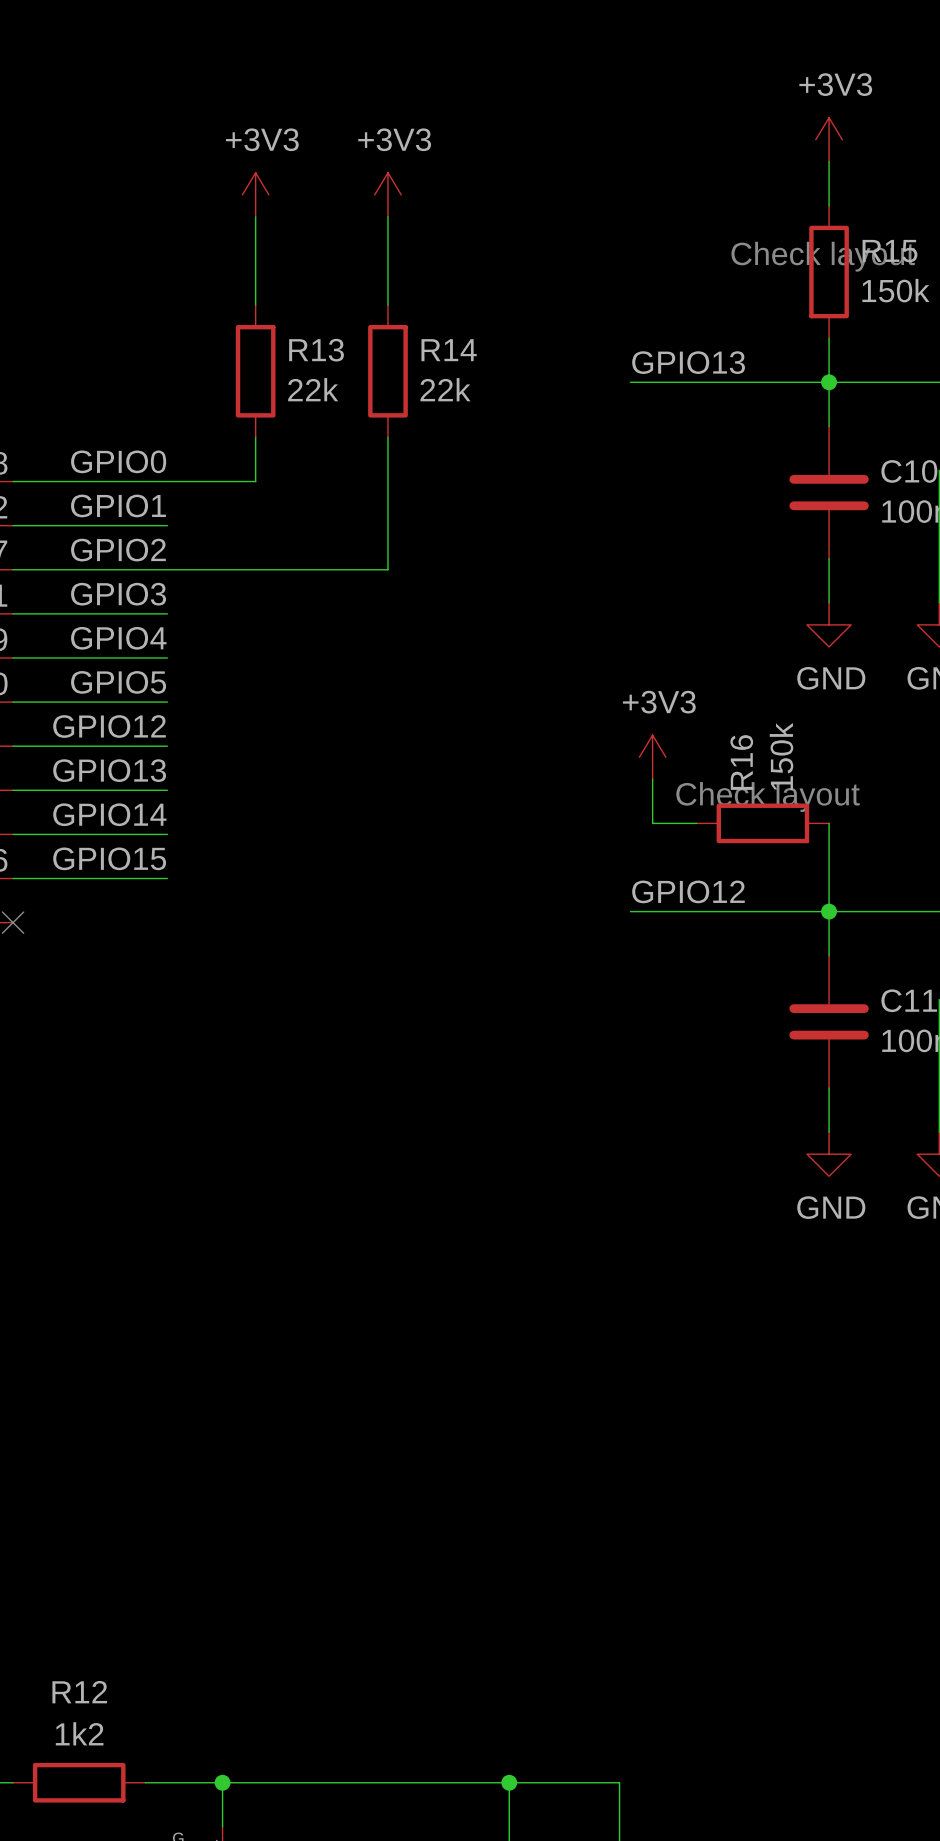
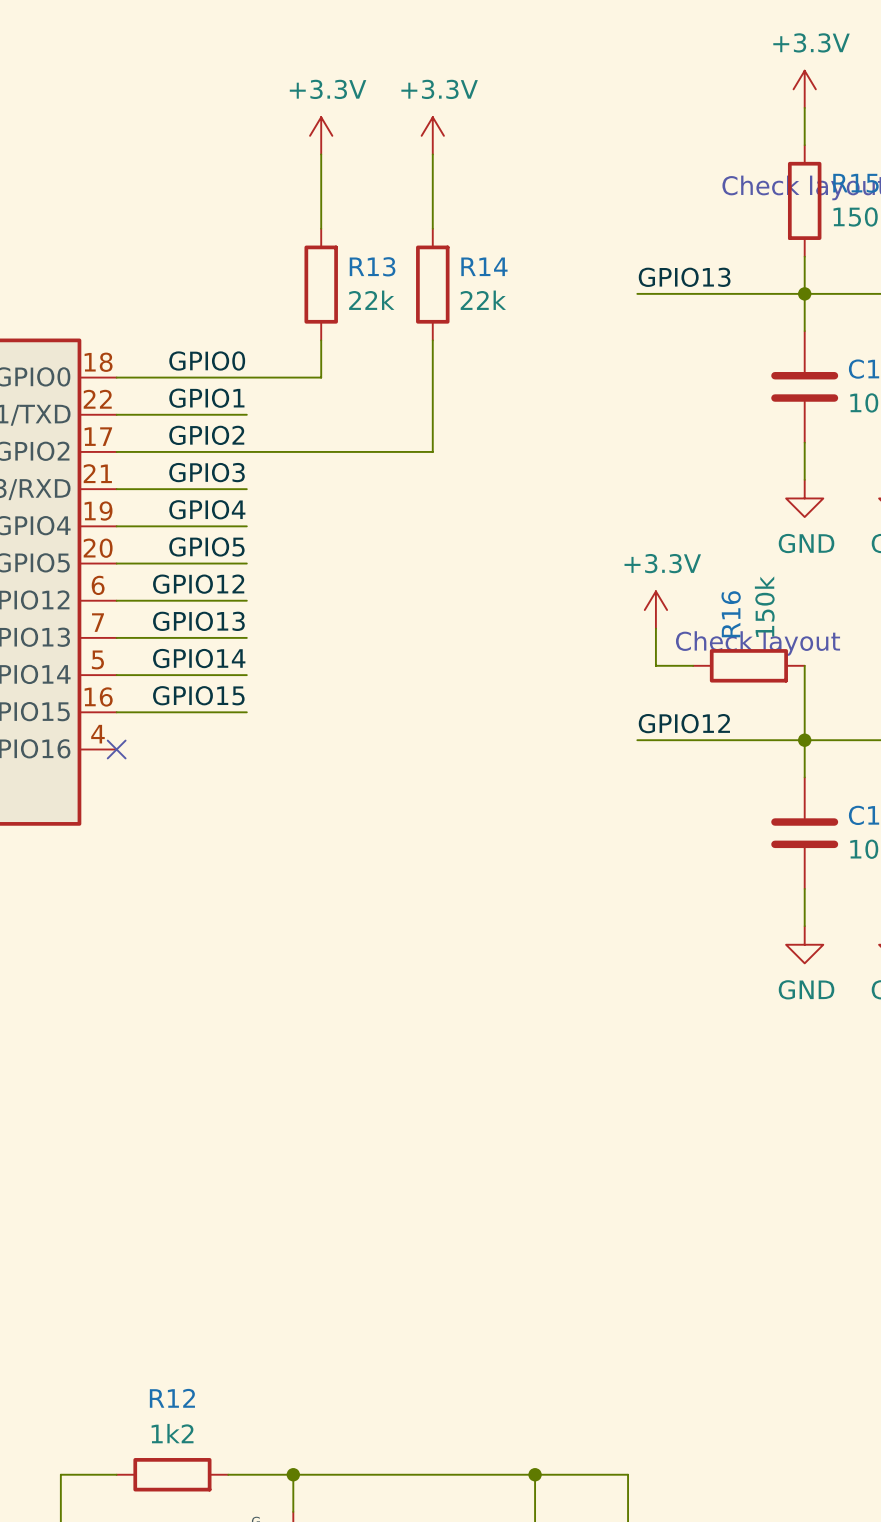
power symbol: +3V3 (829, 139) -> +3.3V (804, 89)
power symbol: +3V3 (255, 194) -> +3.3V (321, 135)
power symbol: +3V3 (387, 194) -> +3.3V (432, 135)
power symbol: +3V3 (652, 757) -> +3.3V (655, 610)

